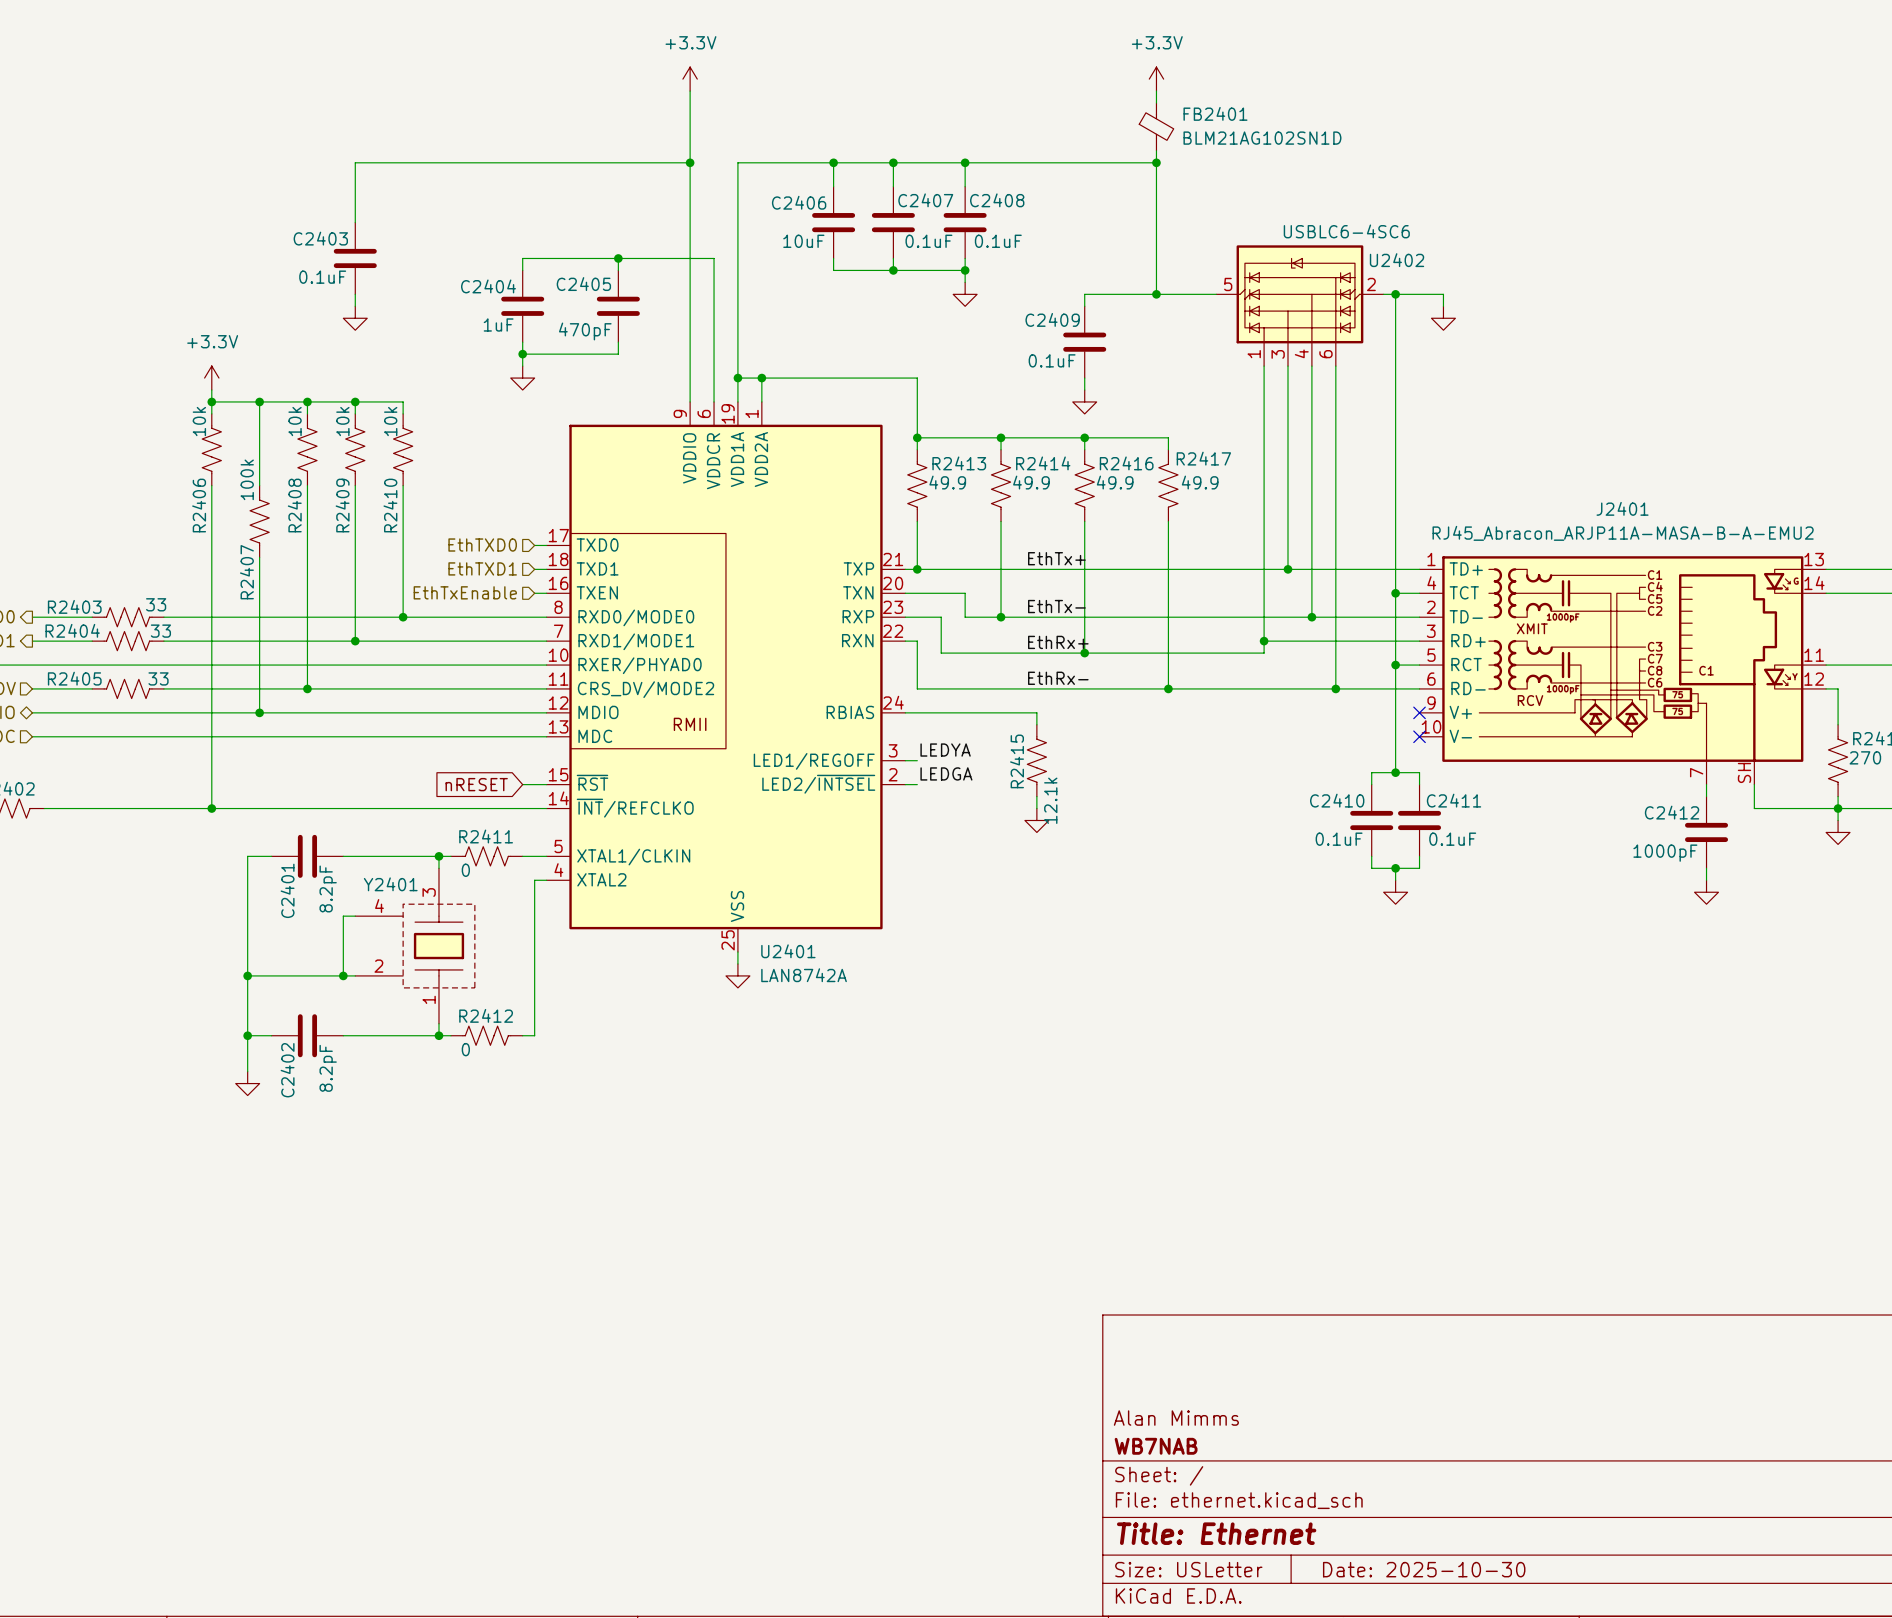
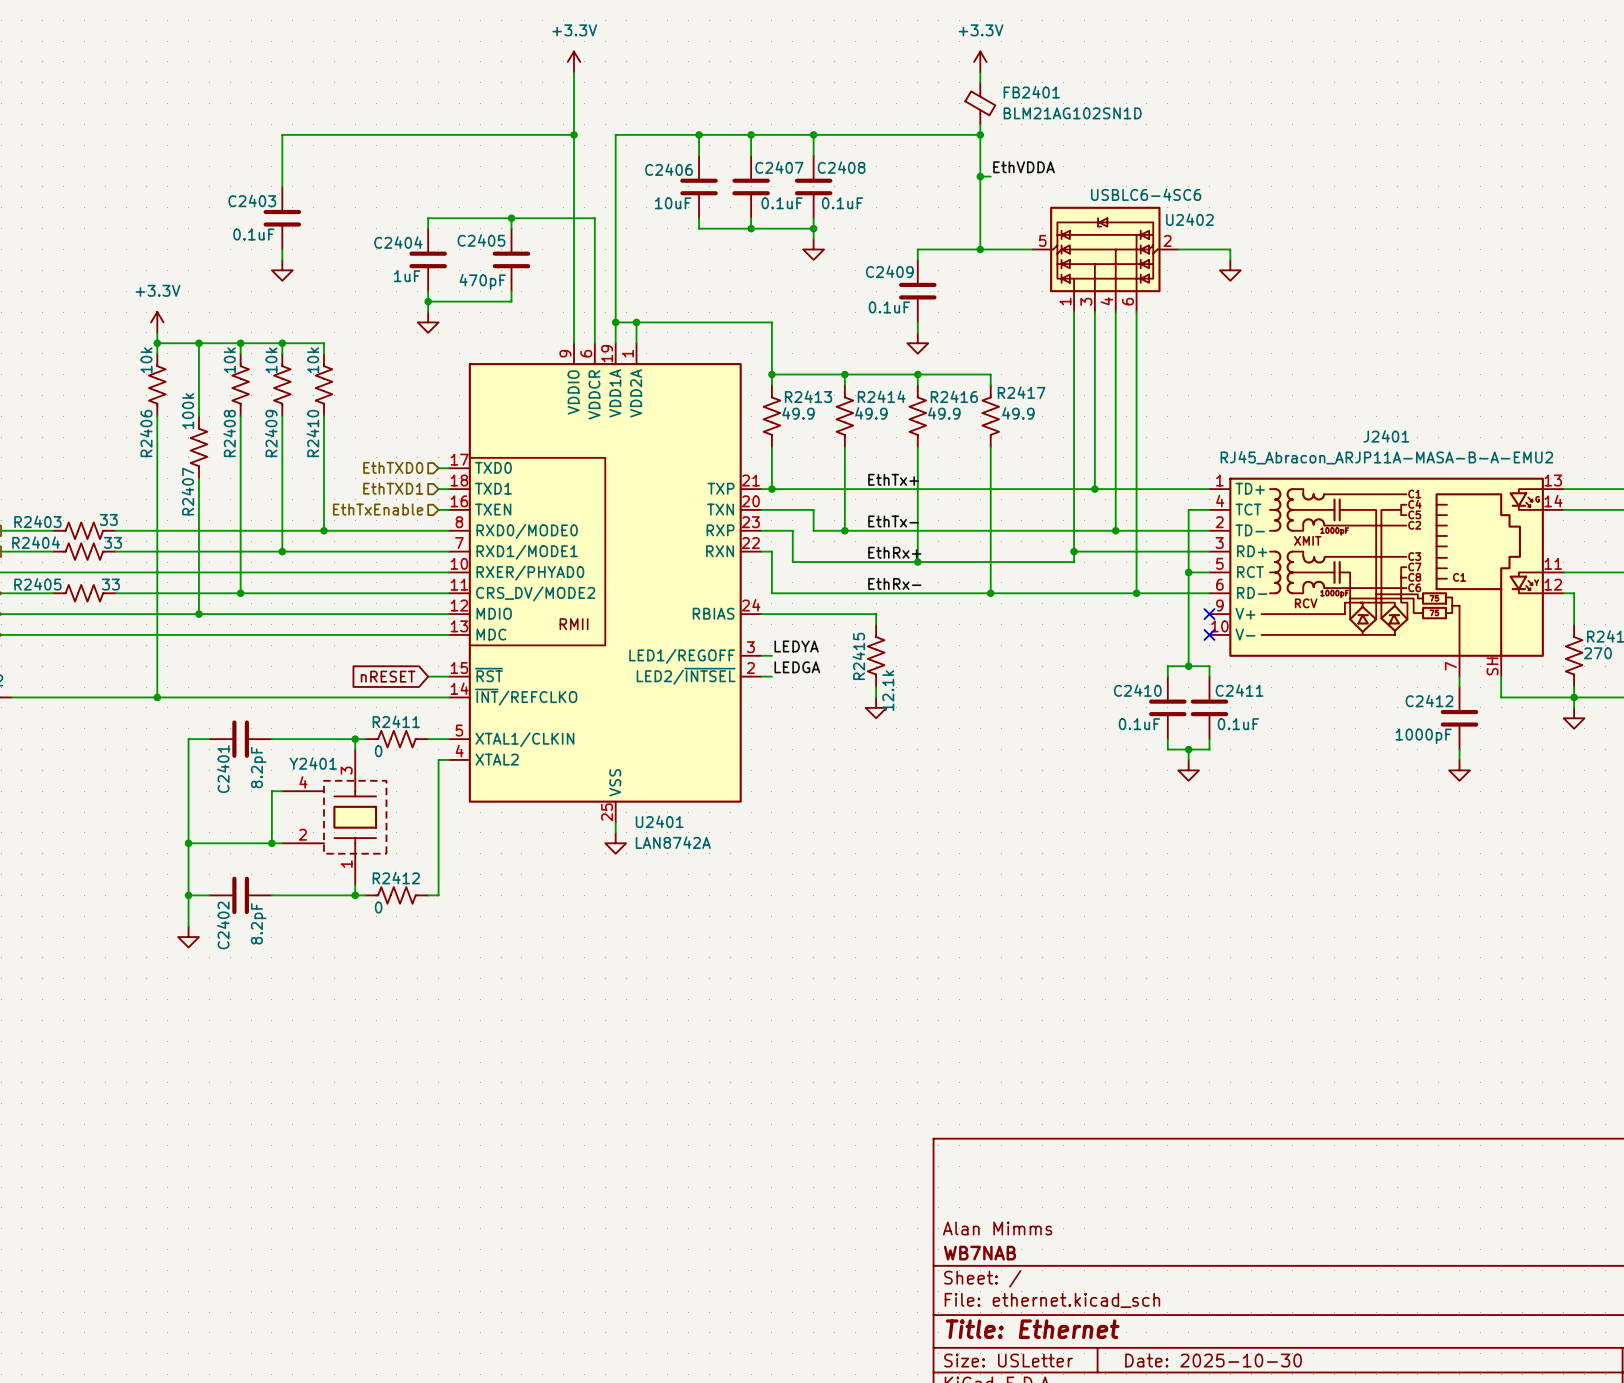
label: none -> EthVDDA (1024, 167)
wire: none -> (980, 176) (990, 176)
junction: none -> (980, 176)
wire: (1395, 294) (1395, 593) -> none
junction: (1395, 294) -> none
junction: (1395, 593) -> none

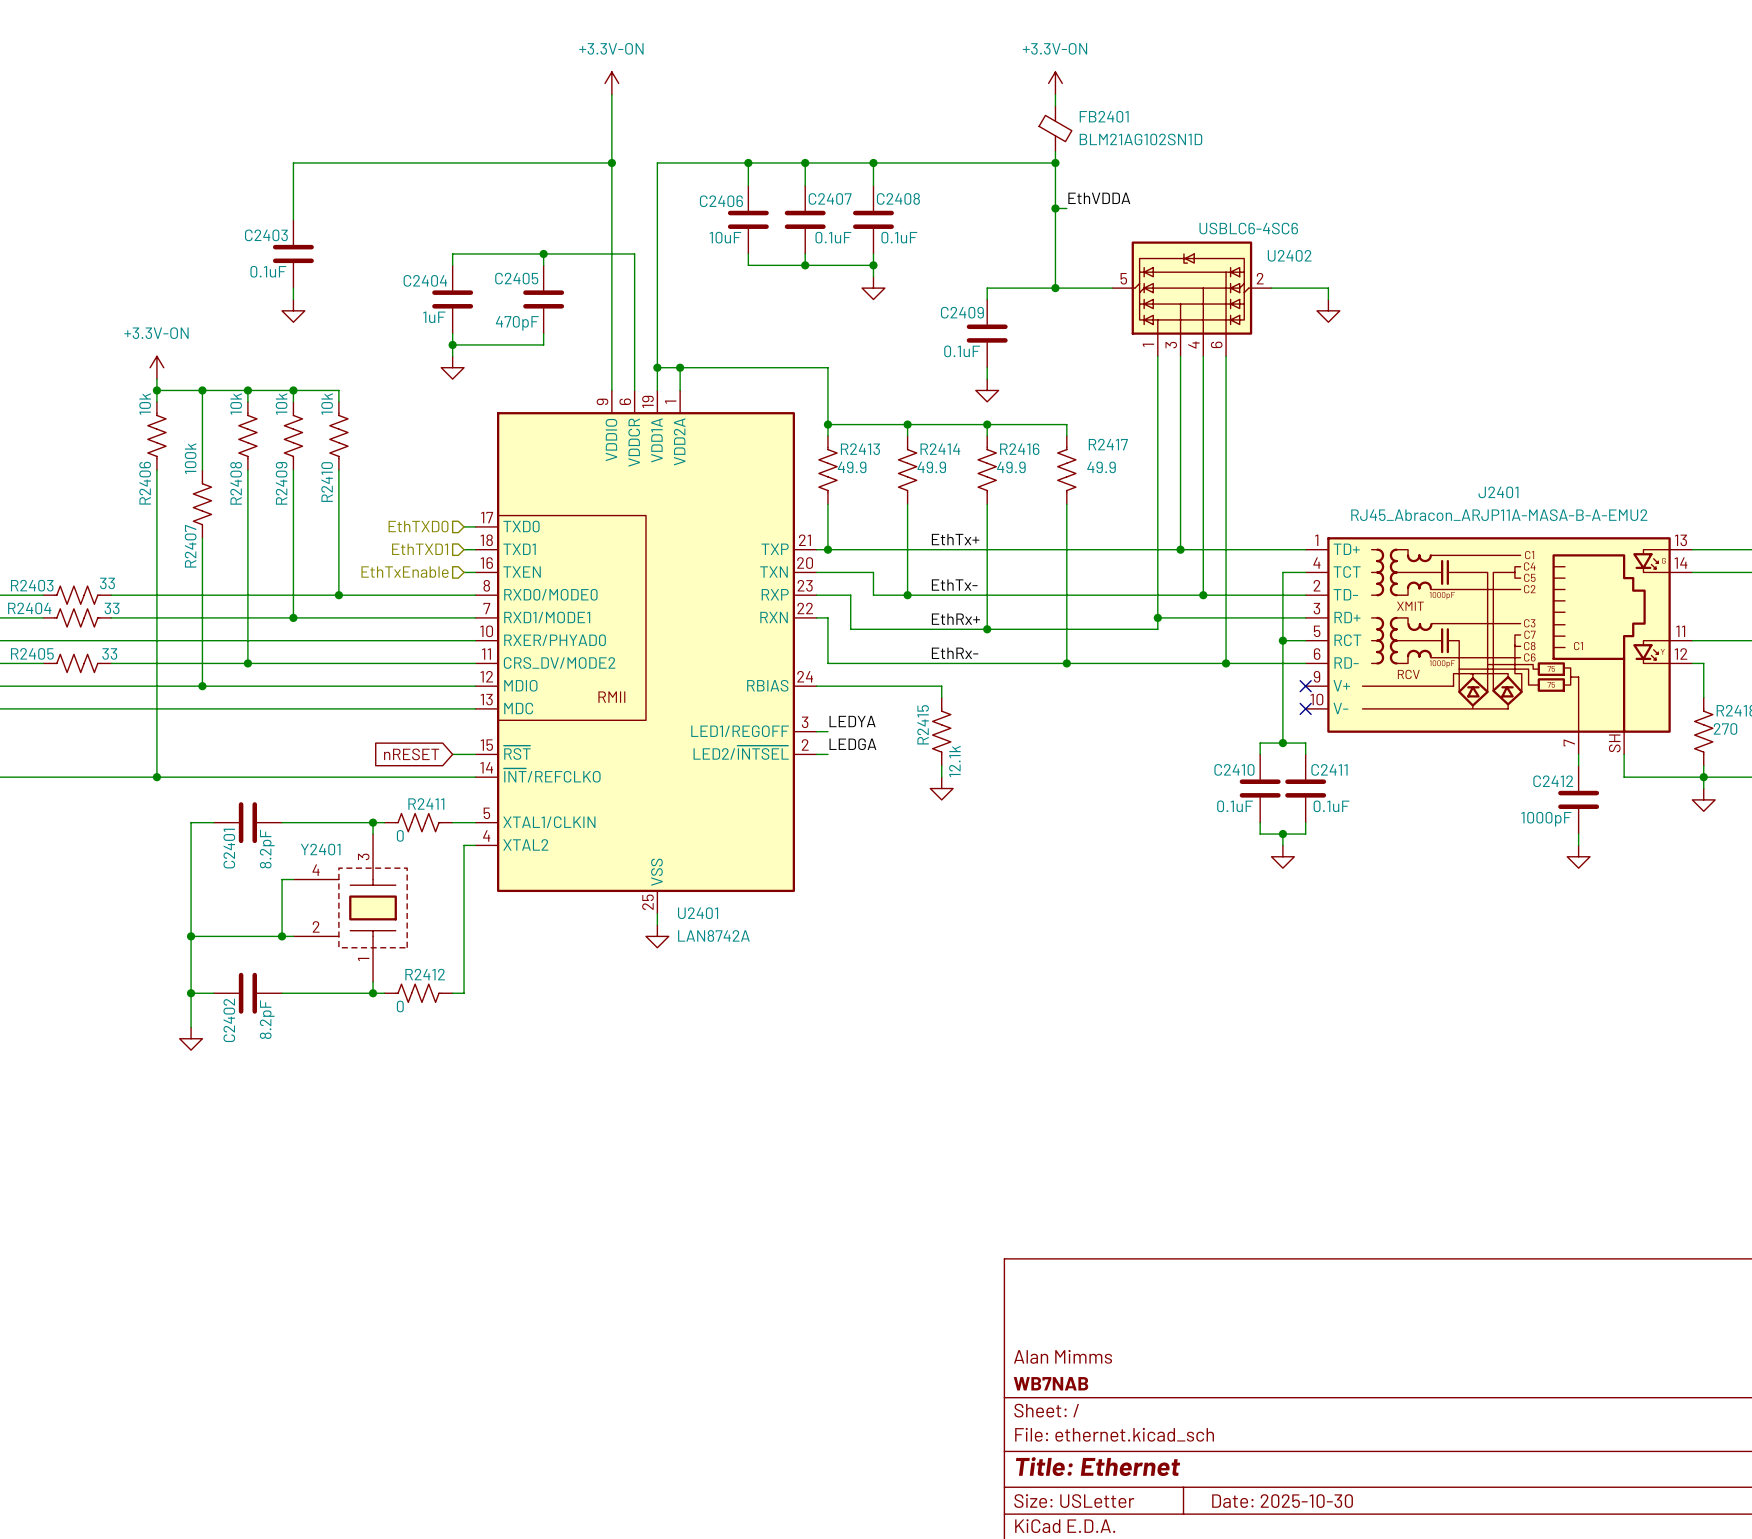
power symbol: +3.3V (574, 61) -> +3.3V-ON (611, 83)
power symbol: +3.3V (980, 61) -> +3.3V-ON (1055, 83)
power symbol: +3.3V (157, 322) -> +3.3V-ON (156, 367)

